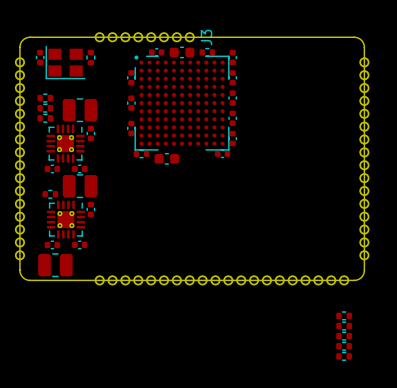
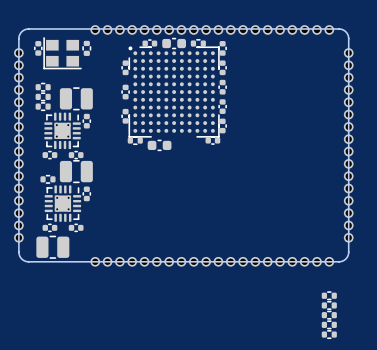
J3: (144, 37) -> none
part: none -> (212, 29)

